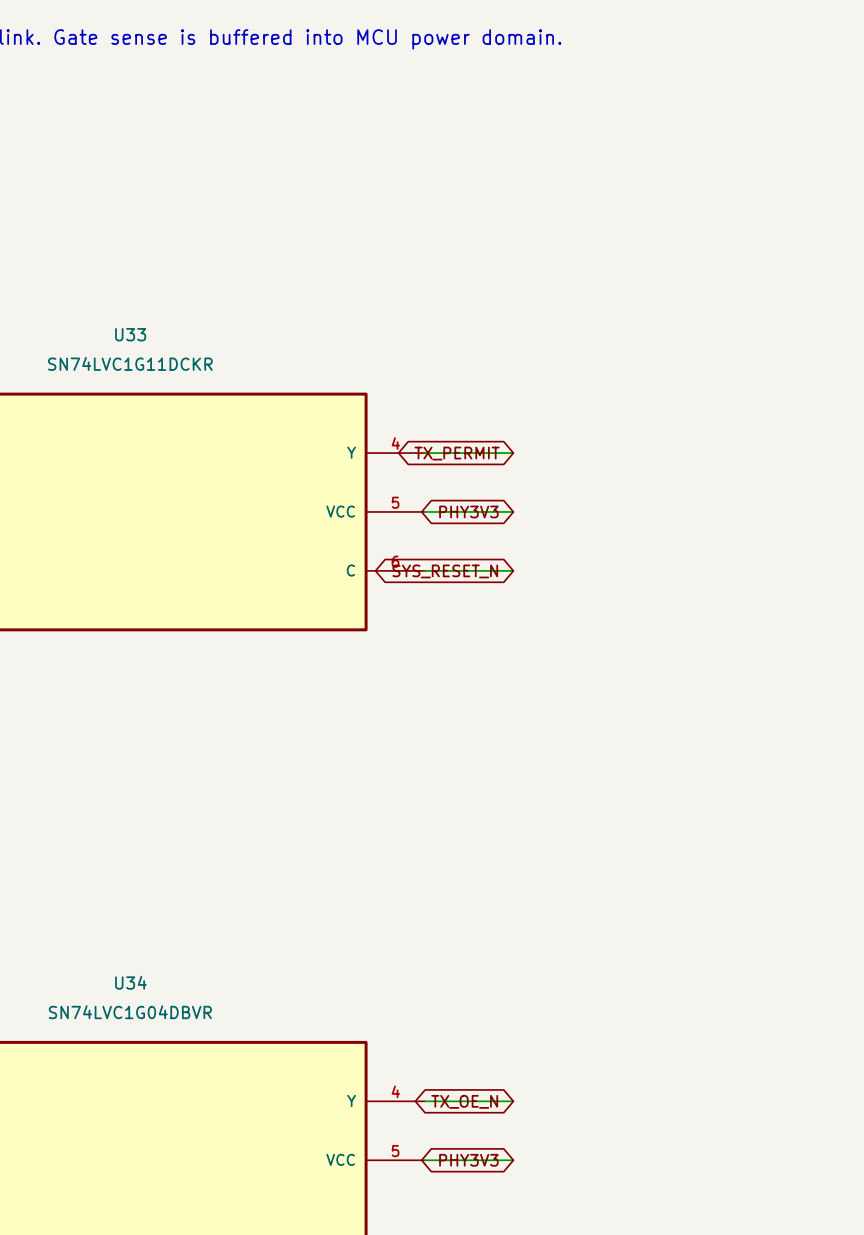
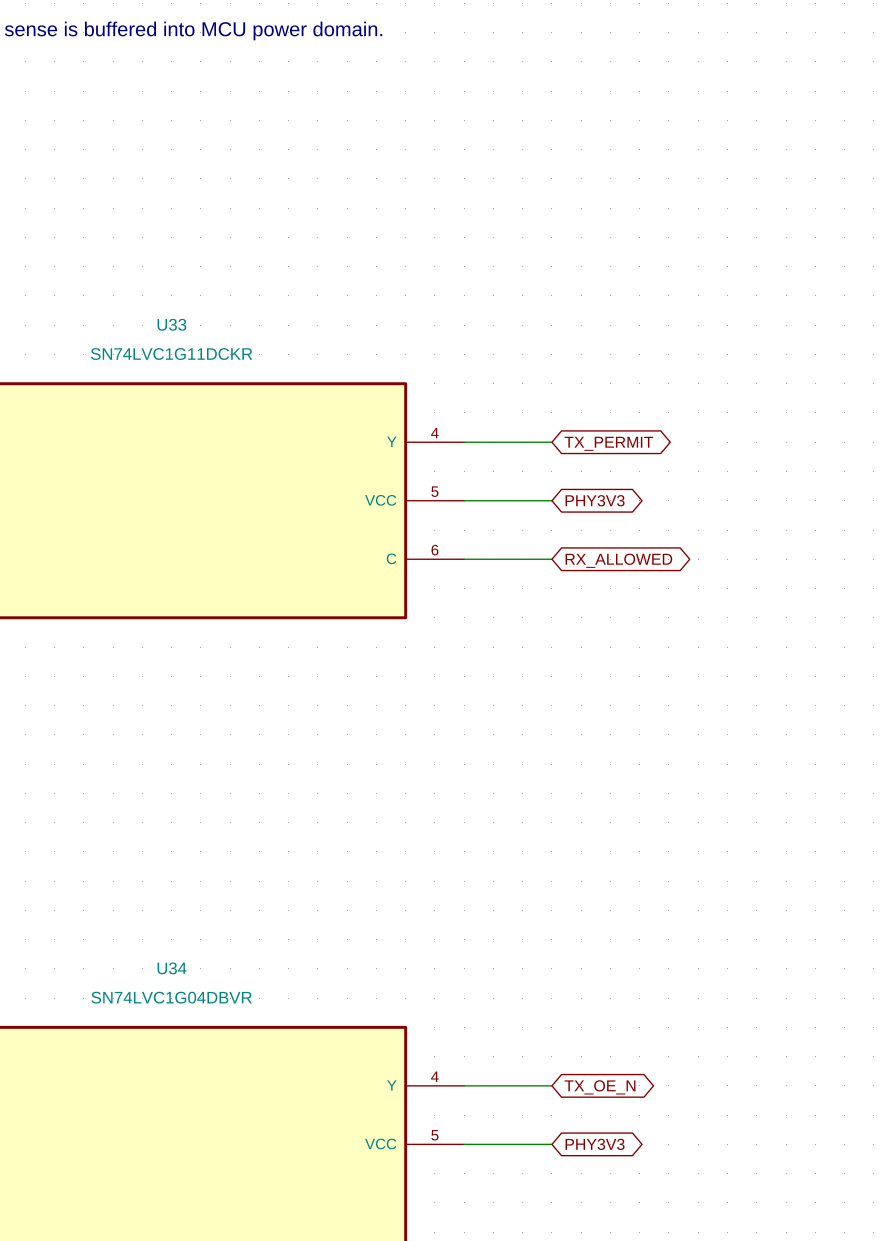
global label rotation: 0° (457, 453) -> 180° (608, 443)
global label position: TX_PERMIT (457, 453) -> TX_PERMIT (608, 443)
global label rotation: 0° (468, 511) -> 180° (595, 500)
global label position: PHY3V3 (468, 511) -> PHY3V3 (595, 500)
global label: SYS_RESET_N (445, 571) -> RX_ALLOWED (618, 560)
global label rotation: 0° (464, 1101) -> 180° (600, 1087)
global label rotation: 0° (468, 1160) -> 180° (595, 1144)
global label position: PHY3V3 (468, 1160) -> PHY3V3 (595, 1144)

